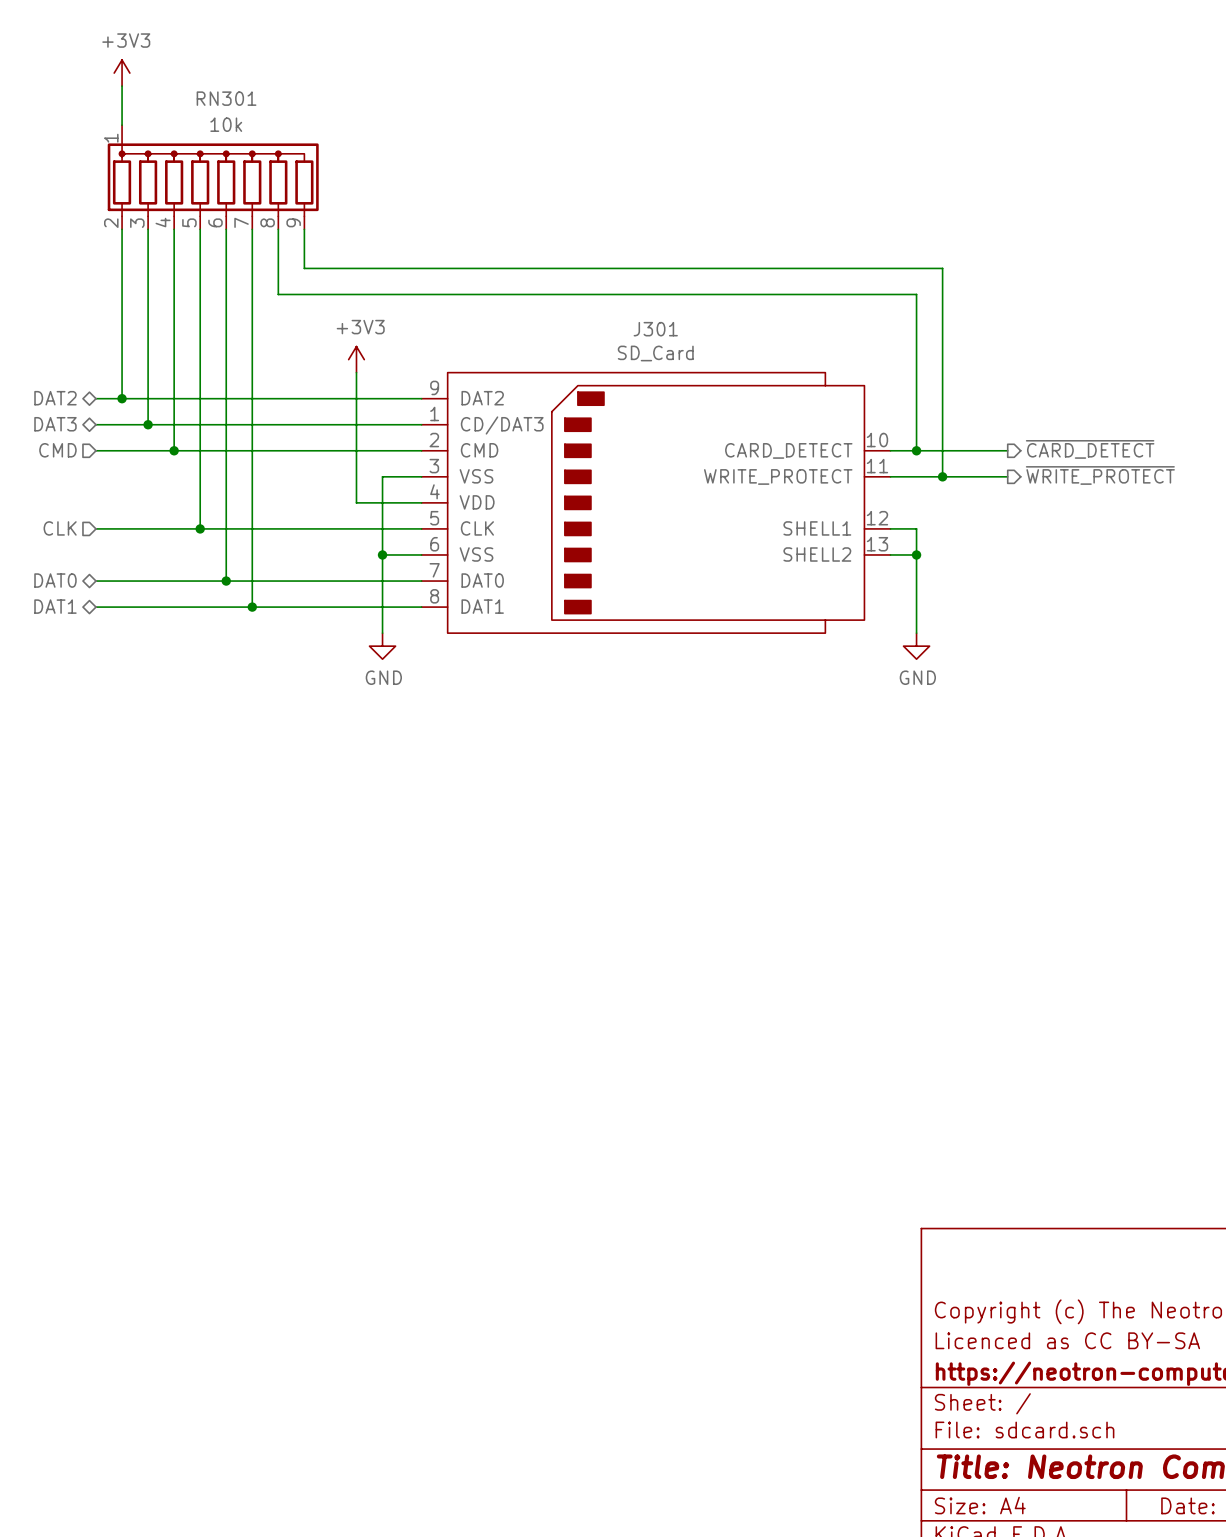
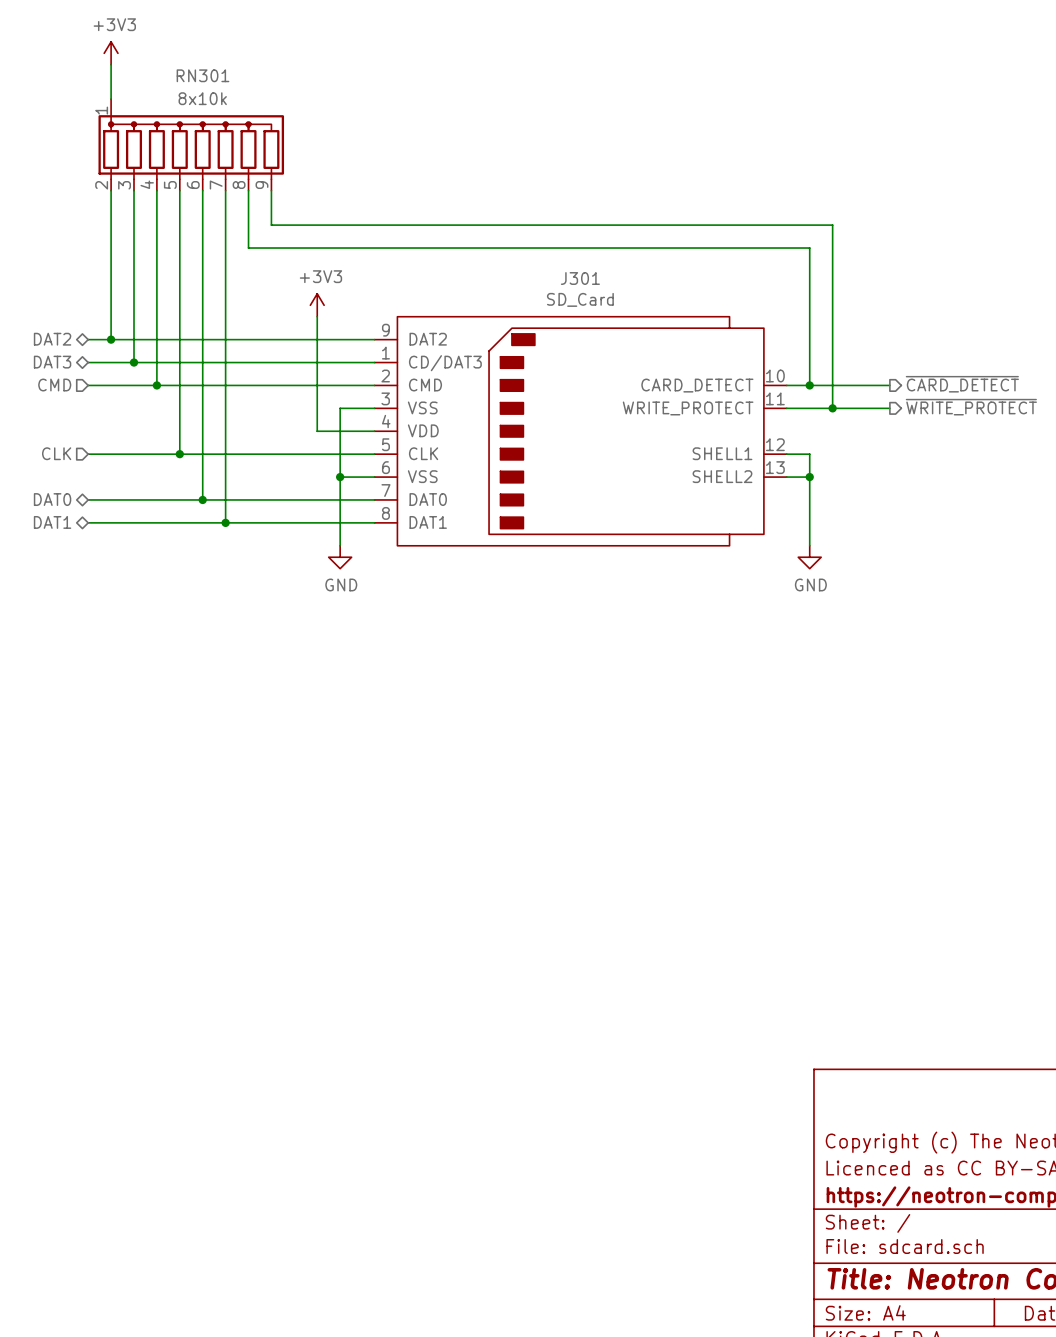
RN301 value: 10k (226, 124) -> 8x10k (202, 98)

